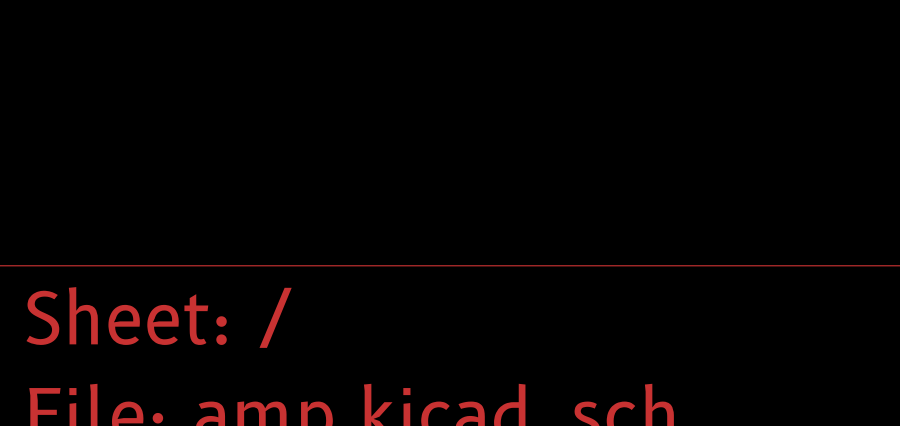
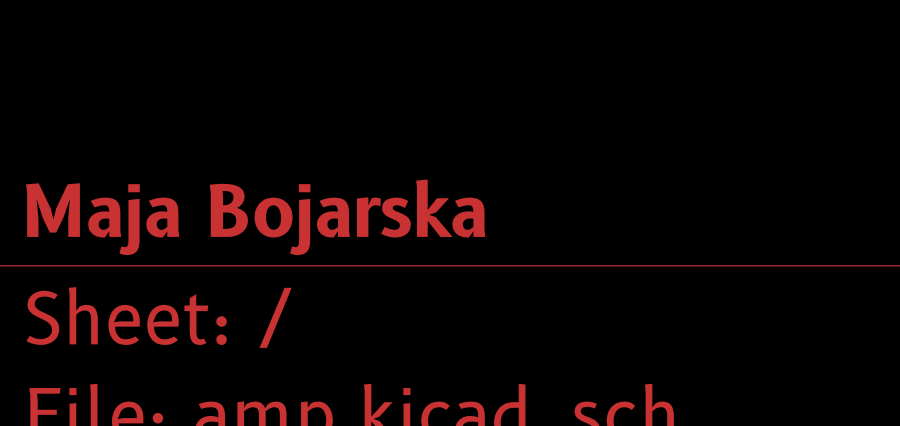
title block: none -> Maja Bojarska (255, 217)

